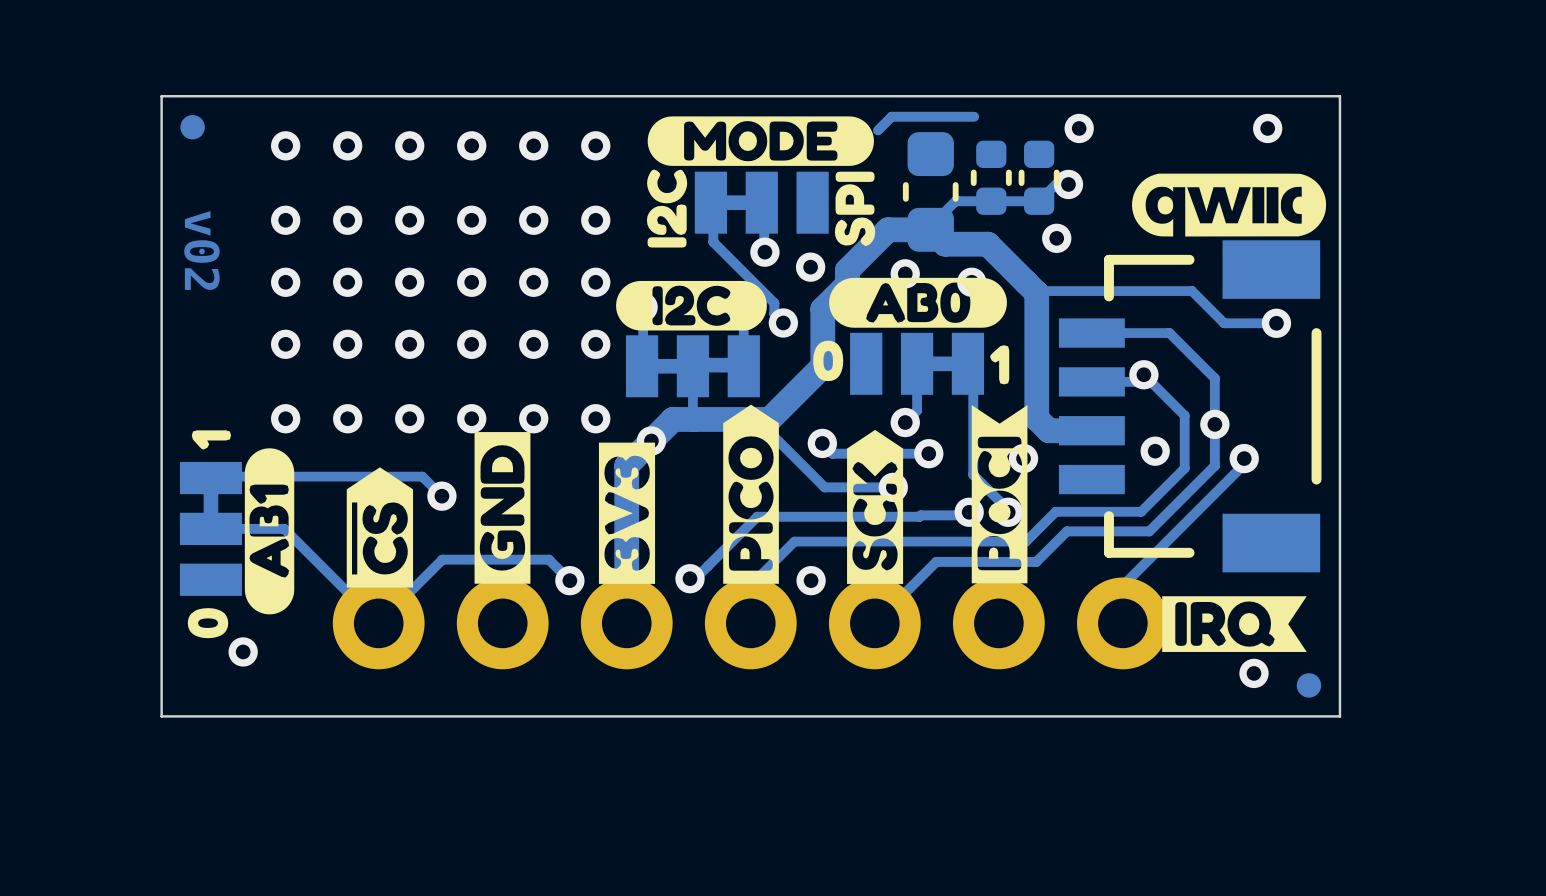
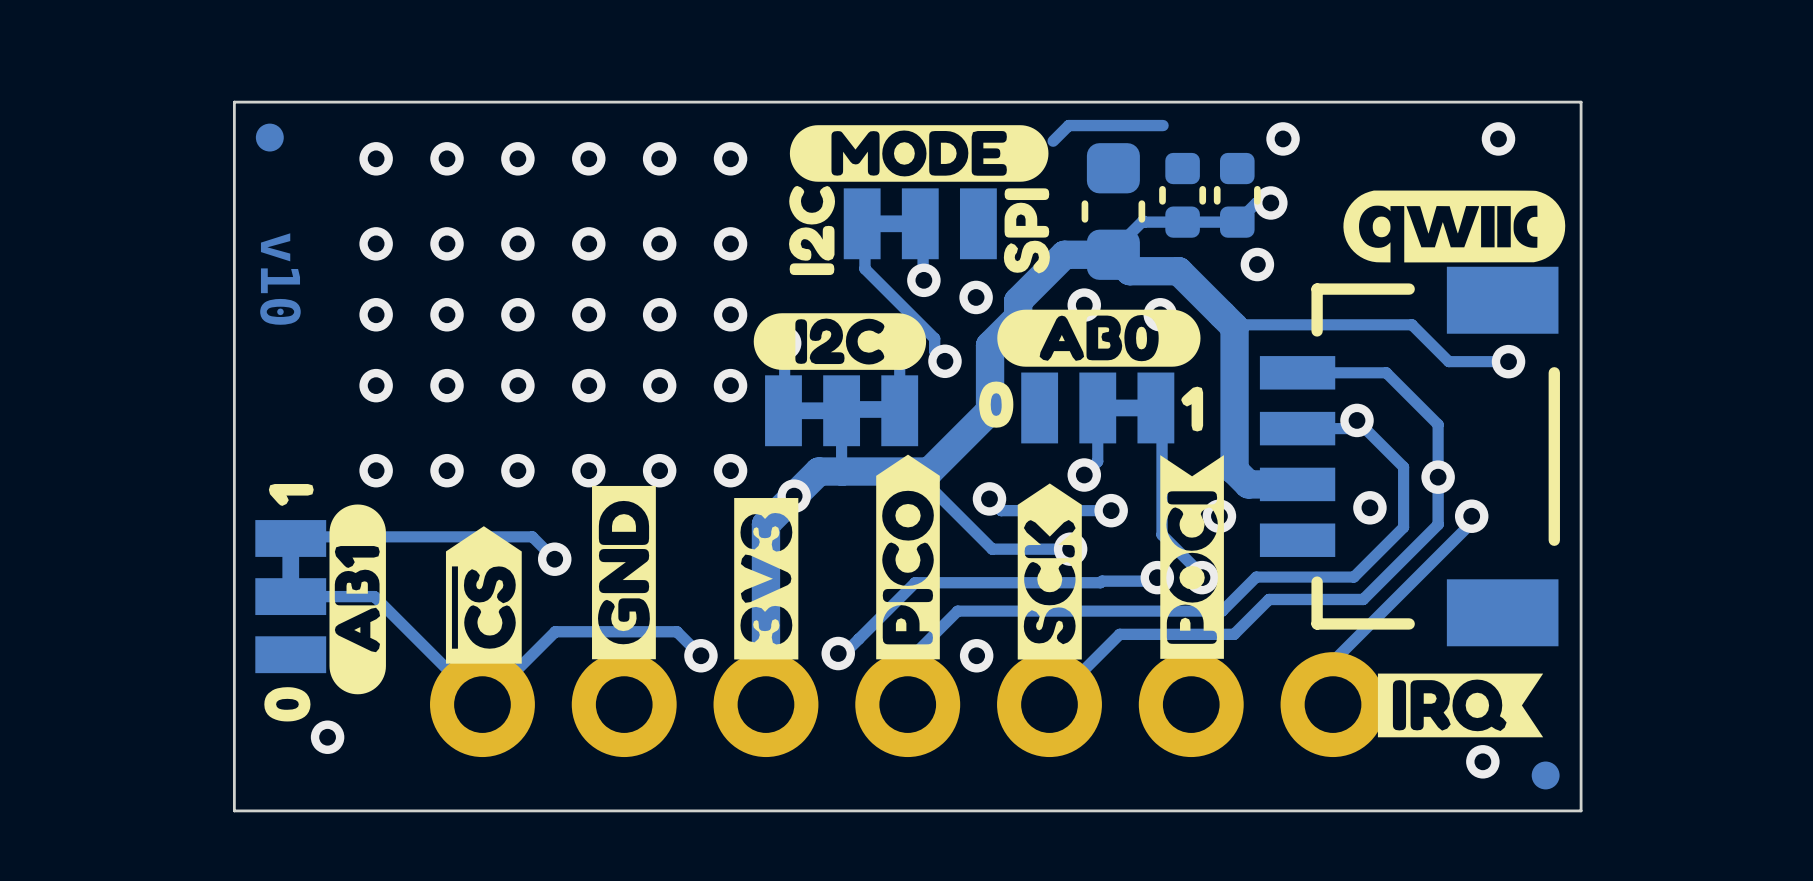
text: v02 (201, 250) -> v10 (280, 279)

